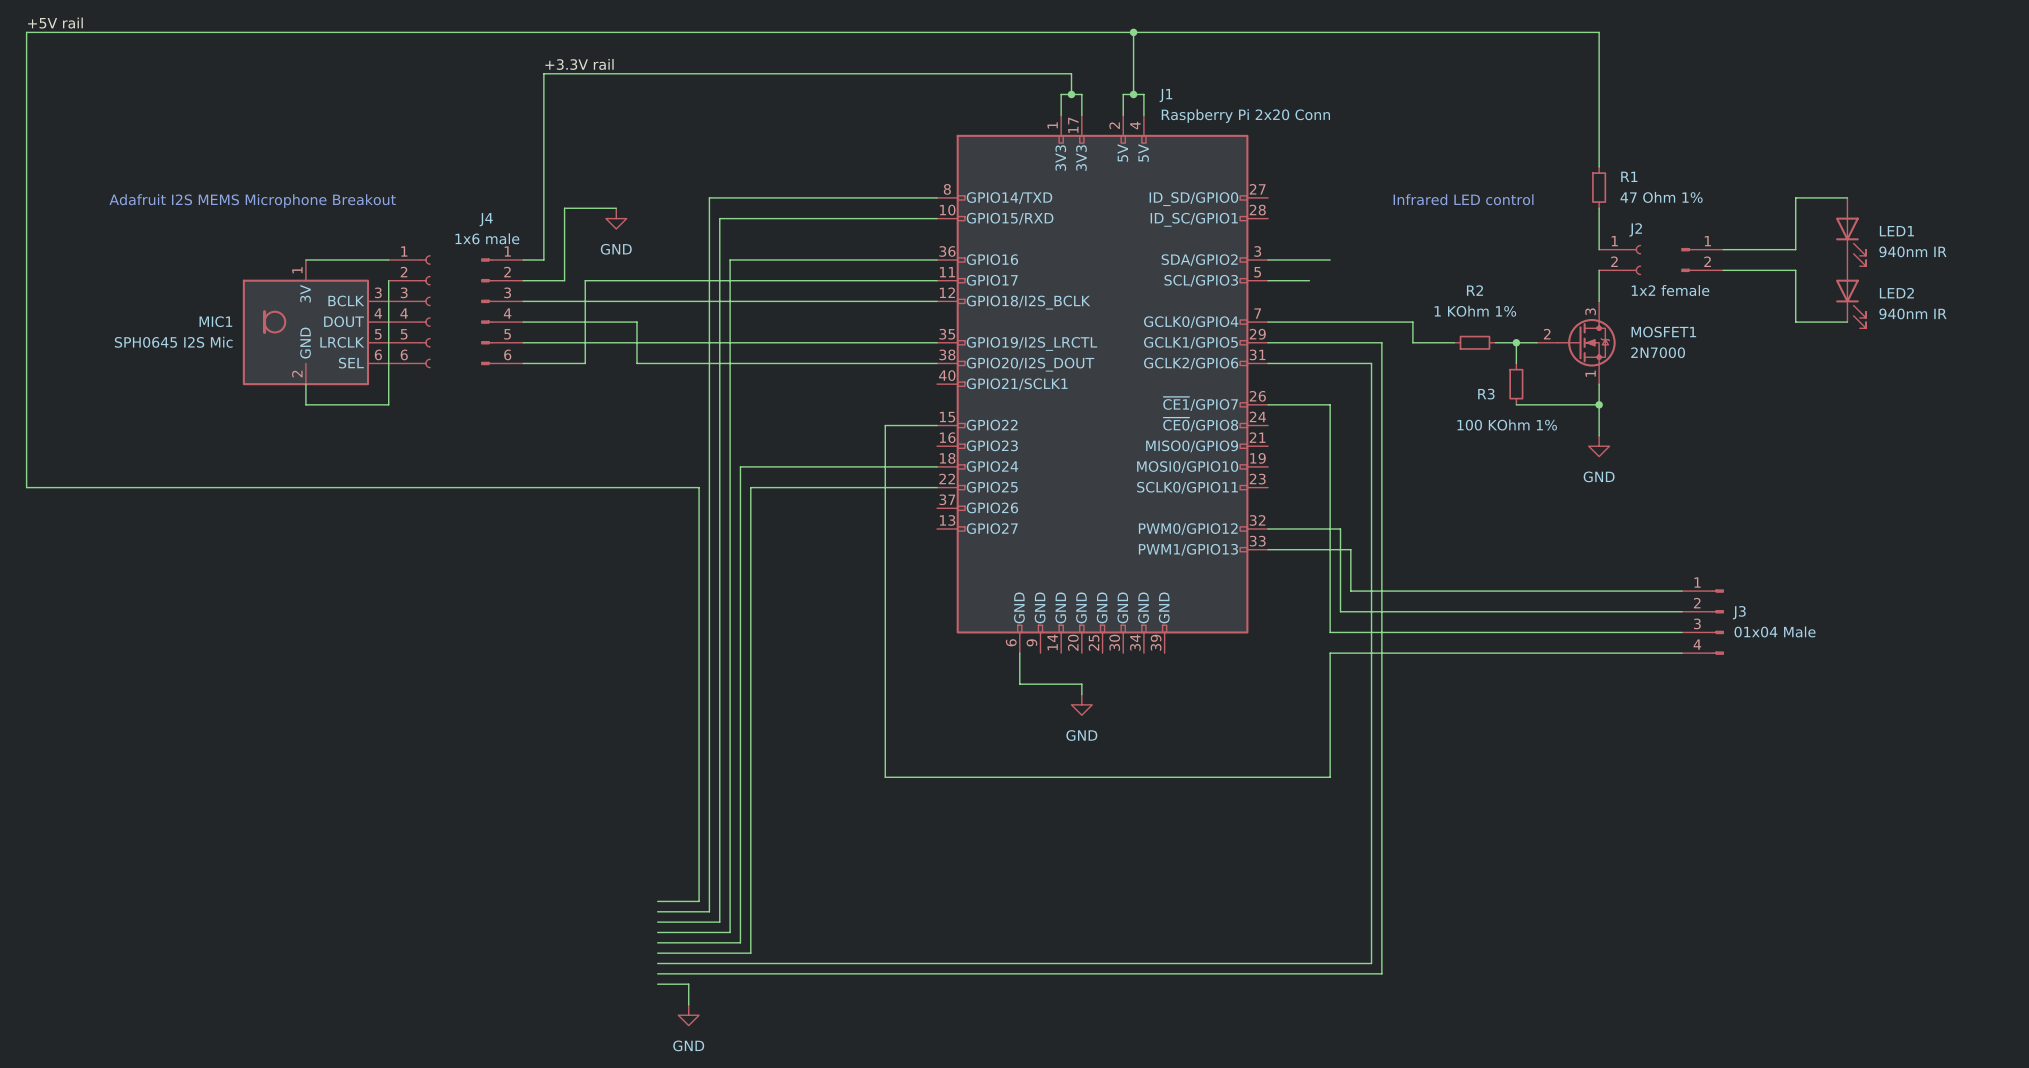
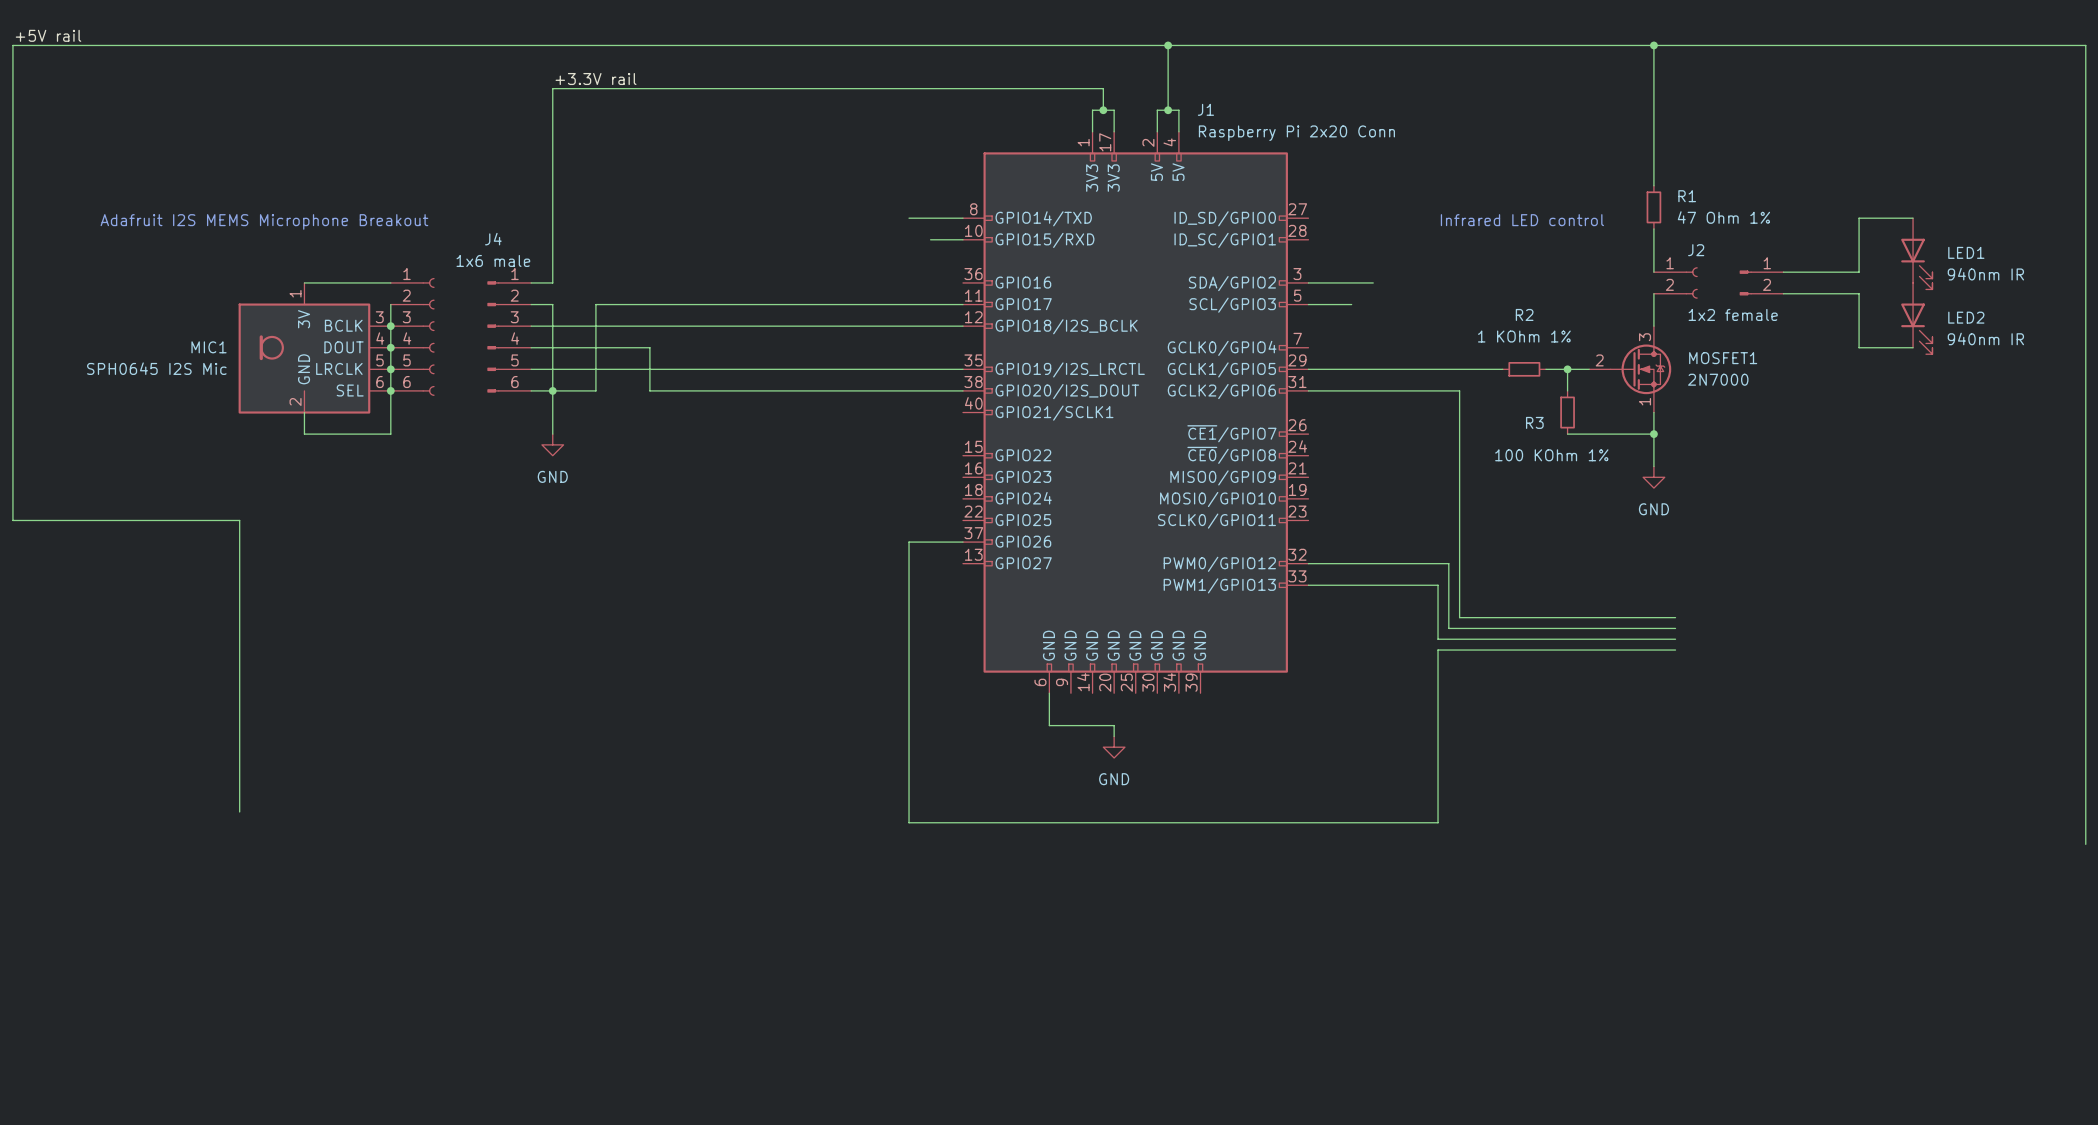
wire: none -> (1653, 45) (2085, 45) (2085, 844)
junction: none -> (1653, 45)
wire: (885, 197) (709, 197) (709, 911) (657, 911) -> none
wire: (616, 208) (564, 208) (564, 280) (543, 280) -> (552, 434) (552, 304)
power symbol: GND (616, 218) -> none
wire: (905, 218) (719, 218) (719, 922) (657, 922) -> none
wire: (937, 260) (730, 260) (730, 932) (657, 932) -> none
junction: none -> (390, 326)
junction: none -> (390, 347)
wire: (1268, 322) (1412, 322) (1412, 342) -> (1427, 369) (1459, 369)
junction: none -> (390, 369)
wire: (1381, 342) (1381, 973) (657, 973) -> none
junction: none -> (390, 390)
junction: none -> (552, 390)
wire: (1371, 363) (1371, 963) (657, 963) -> (1416, 390) (1459, 390) (1459, 617) (1675, 617)
wire: (1268, 404) (1330, 404) (1330, 632) (1681, 632) -> none
power symbol: none -> GND (552, 444)
wire: (937, 425) (885, 425) (885, 508) -> (962, 542) (909, 542)
wire: (937, 466) (740, 466) (740, 942) (657, 942) -> none
wire: (243, 487) (699, 487) (699, 901) (657, 901) -> (239, 520) (239, 811)
wire: (937, 487) (750, 487) (750, 953) (657, 953) -> none
wire: (1340, 528) (1340, 611) (1392, 611) -> (1373, 822) (1438, 822) (1438, 650)
wire: (1350, 549) (1350, 591) (1402, 591) -> (1384, 563) (1448, 563) (1448, 628)
wire: none -> (1394, 585) (1438, 585) (1438, 639) (1675, 639)
wire: (1619, 591) (1681, 591) -> none
wire: (1619, 611) (1681, 611) -> none
J3: 01x04 Male (1702, 622) -> none
wire: (1681, 653) (1330, 653) (1330, 777) -> none
wire: (657, 984) (688, 984) (688, 1004) -> none
power symbol: GND (688, 1015) -> none

